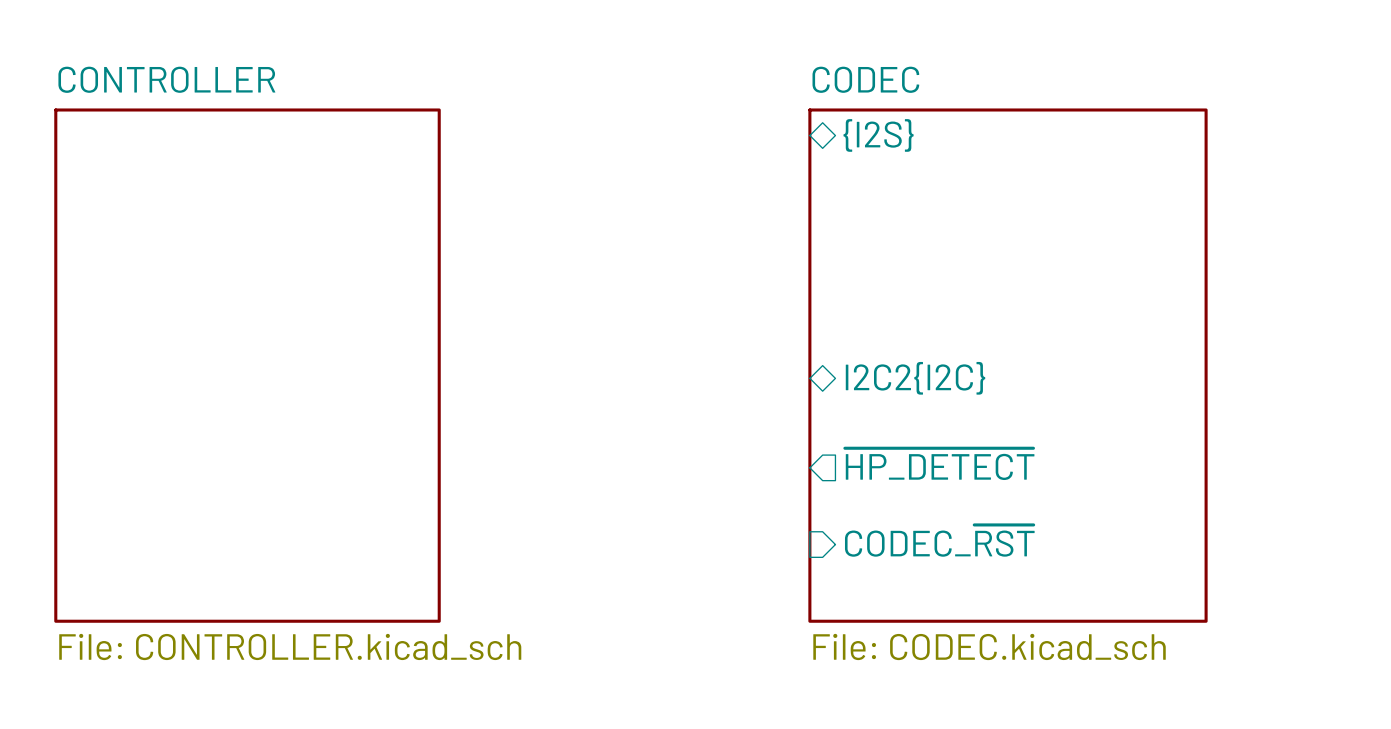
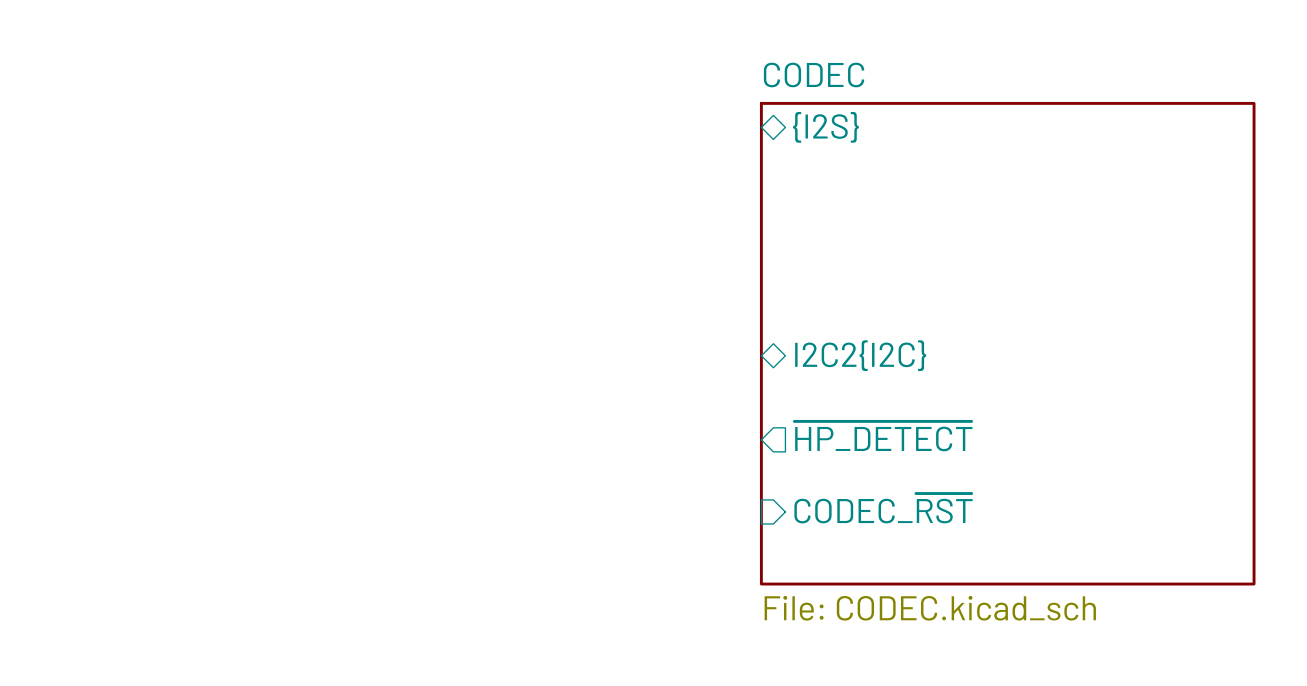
sheet CONTROLLER: File: CONTROLLER.kicad_sch (247, 365) -> none
sheet CODEC: File: CODEC.kicad_sch (1007, 365) -> none
sheet CODEC: none -> File: CODEC.kicad_sch (1007, 343)

